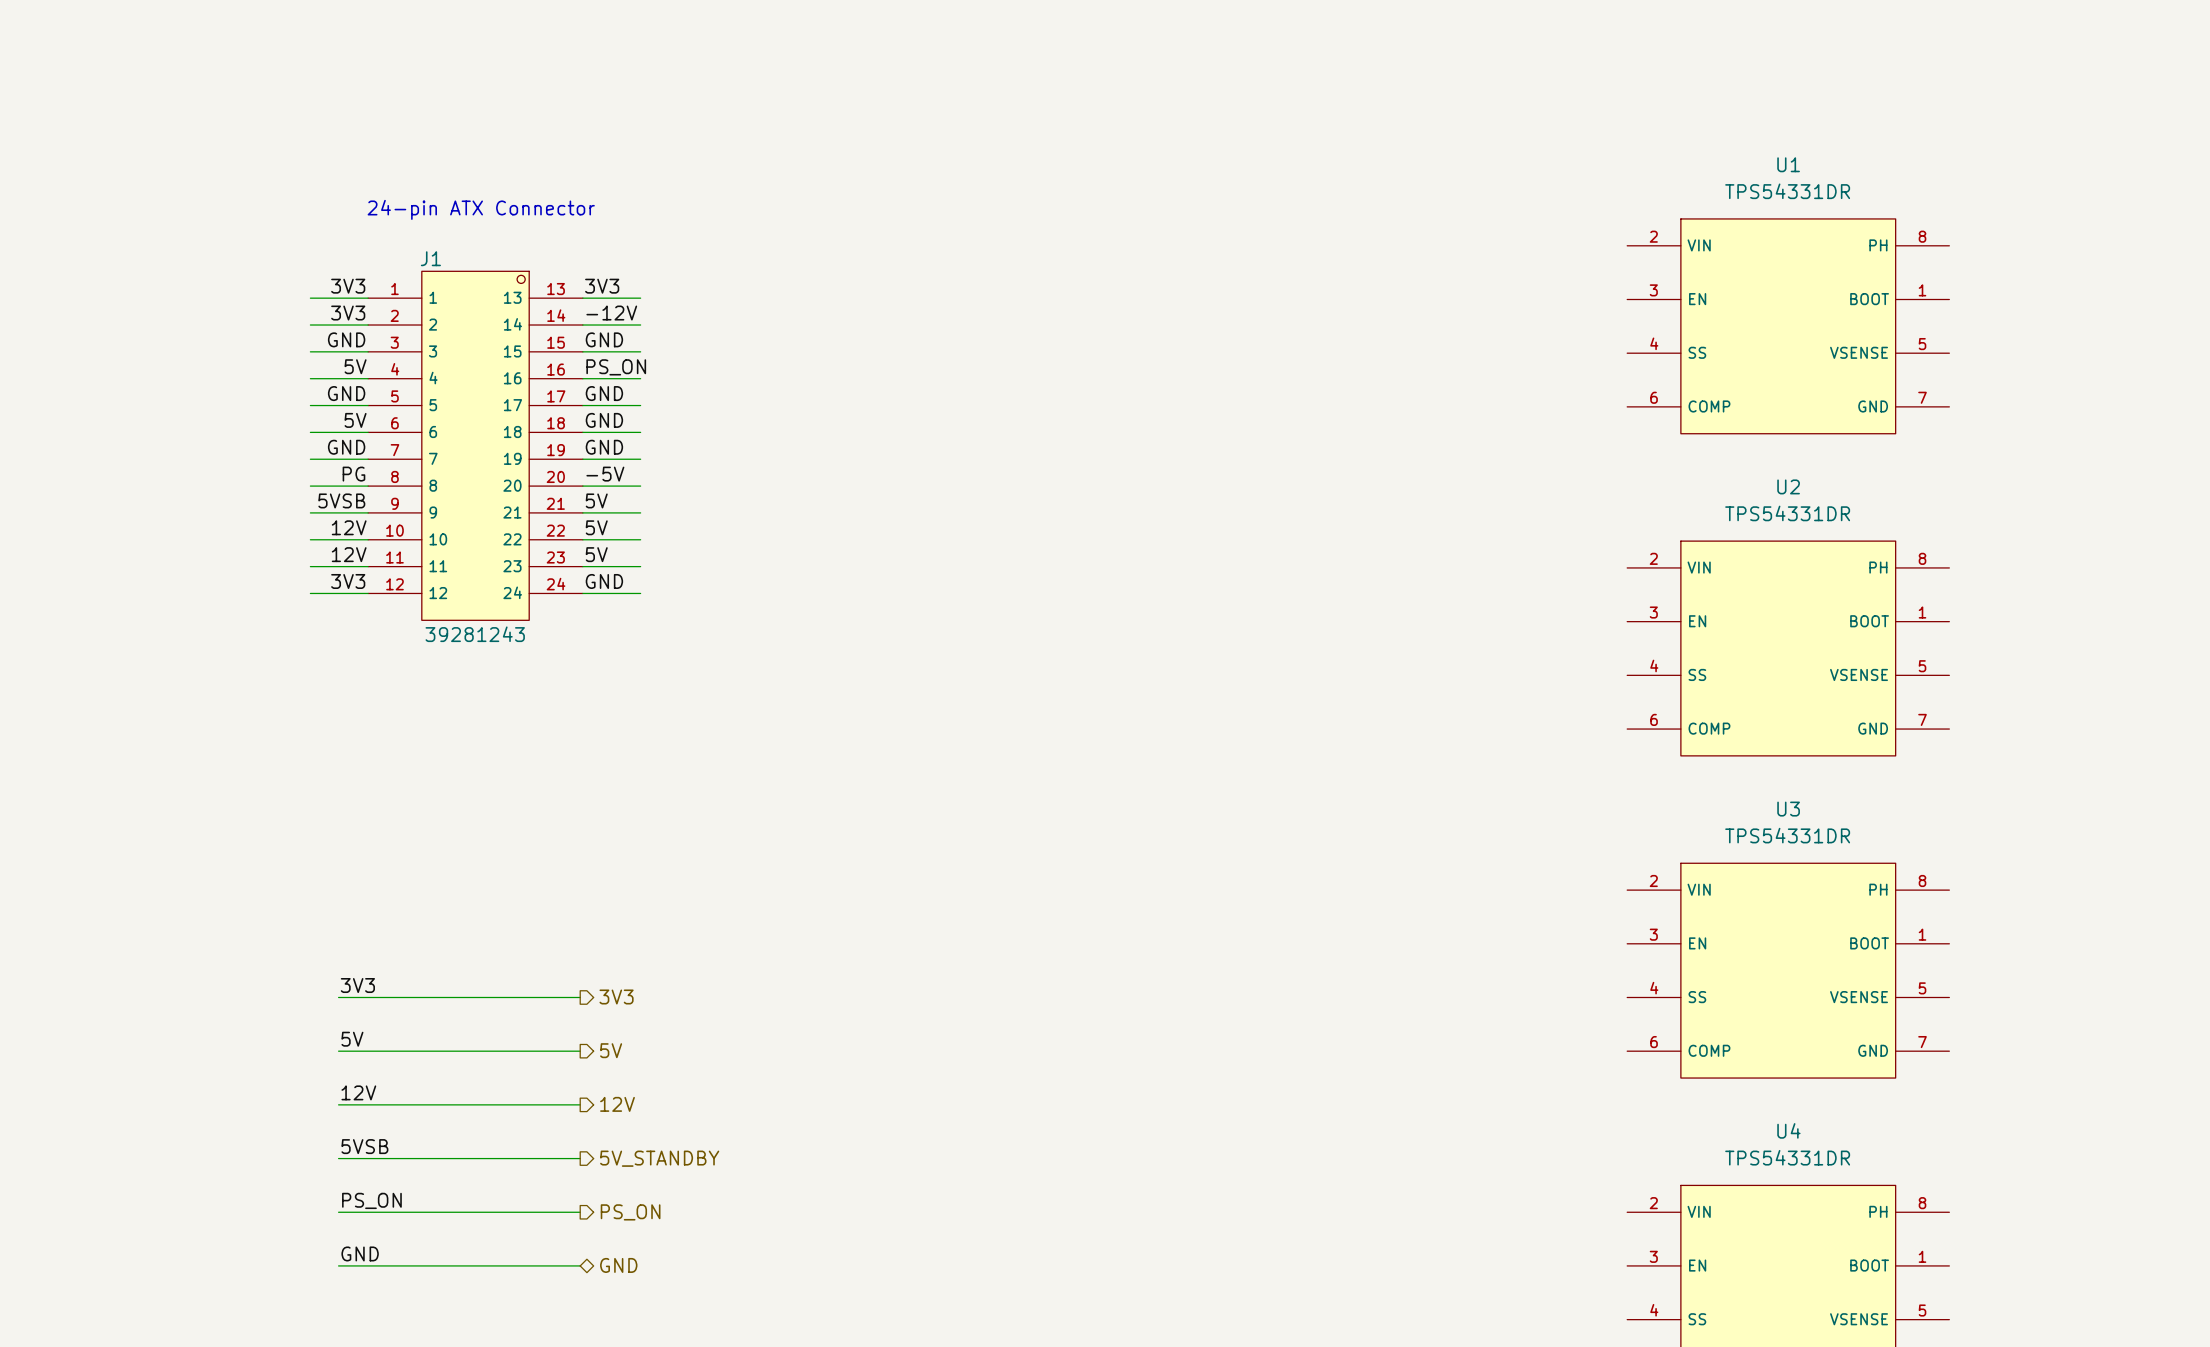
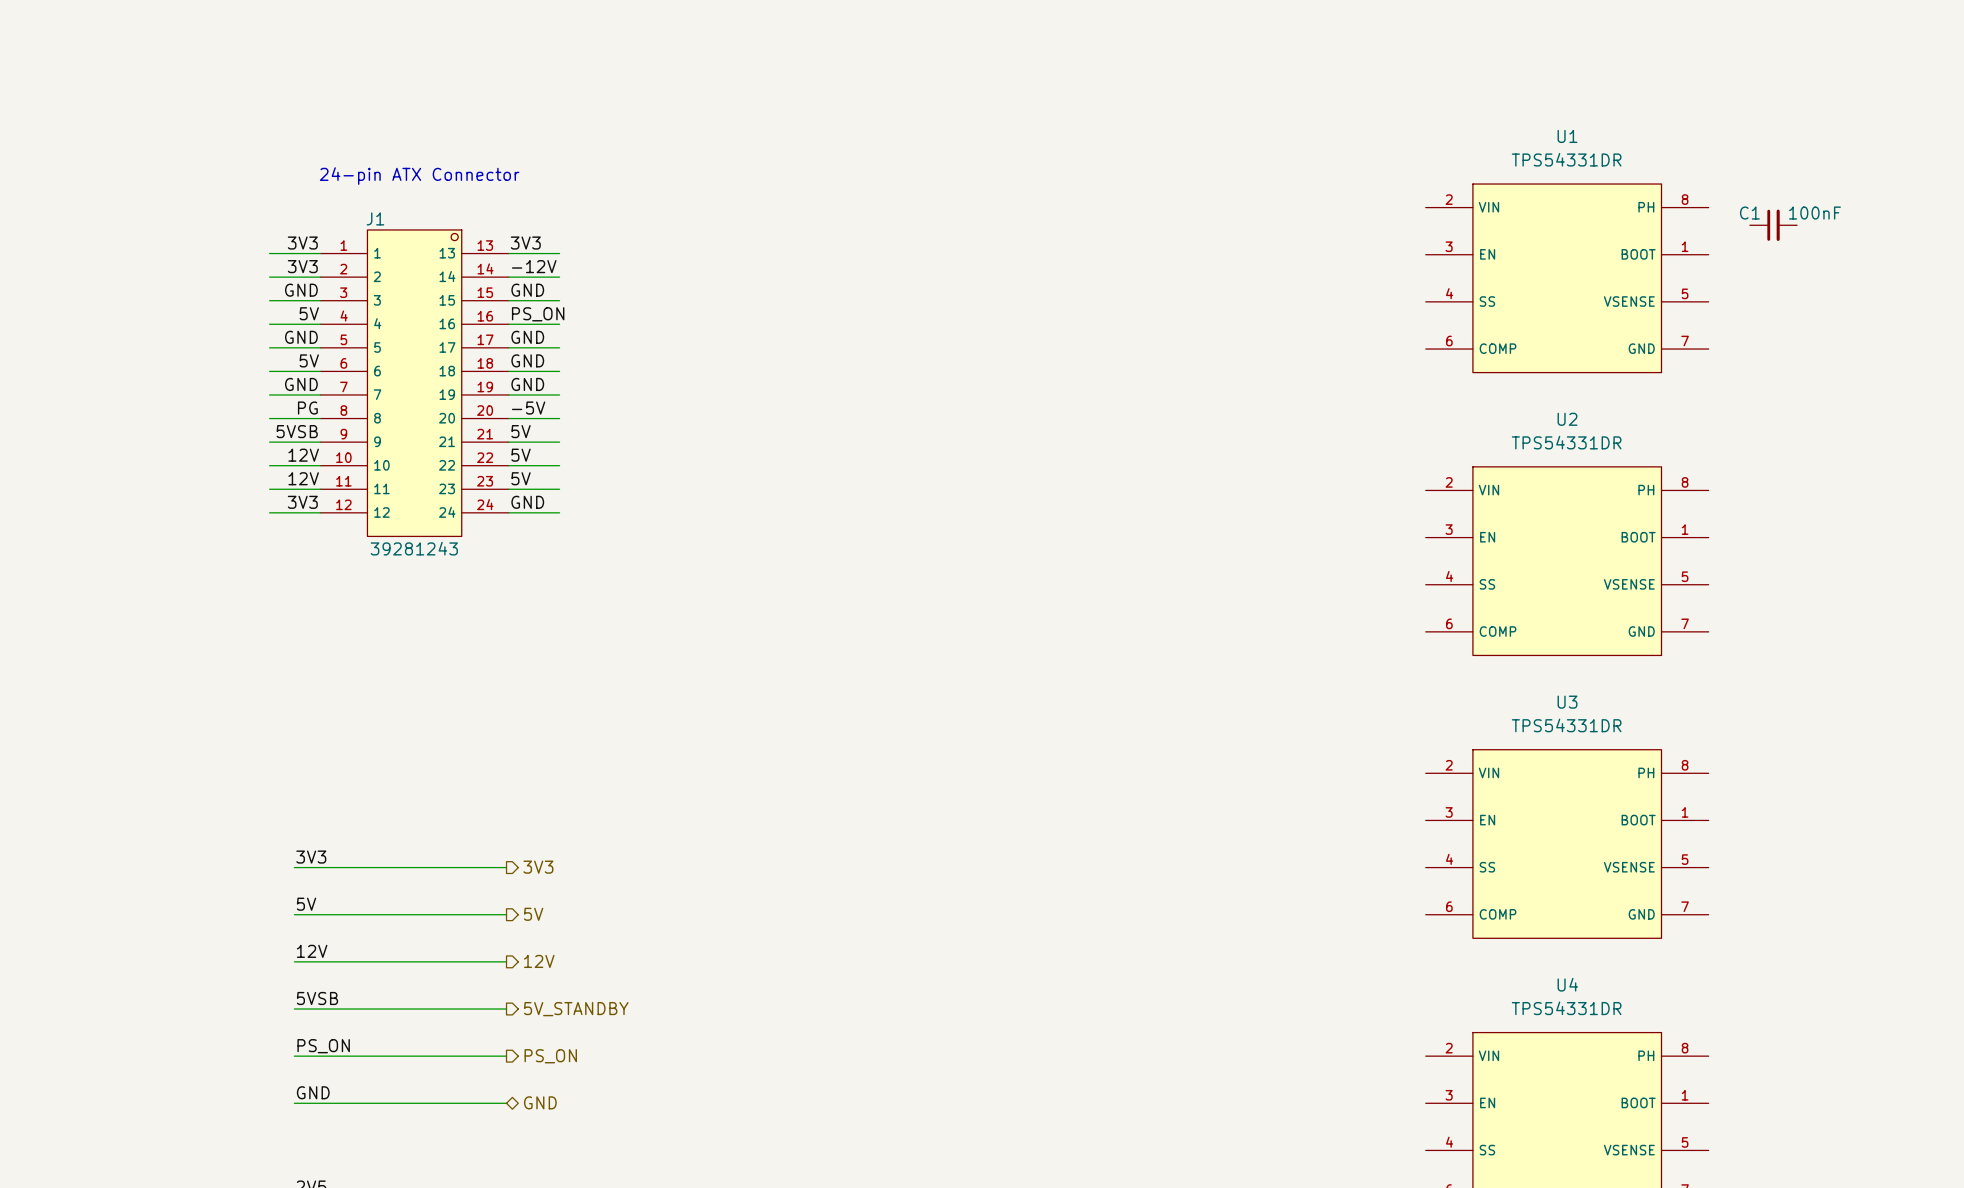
C1: none -> 100nF (1773, 225)

